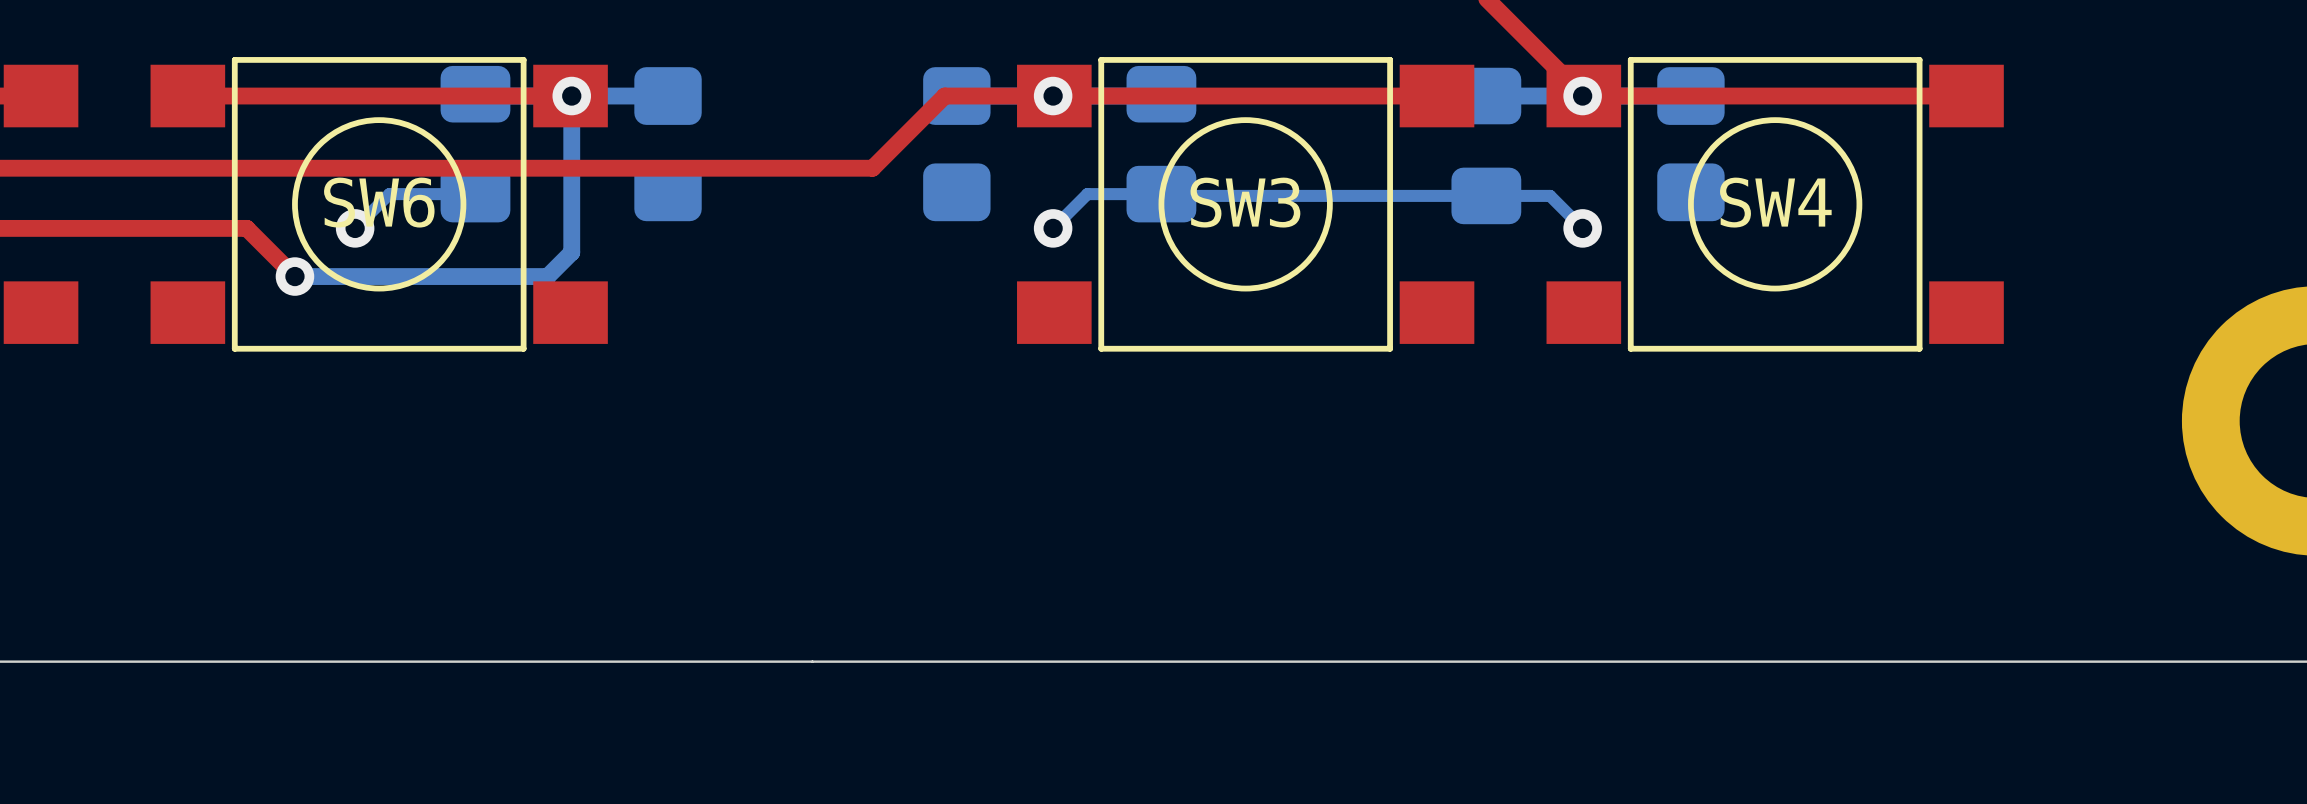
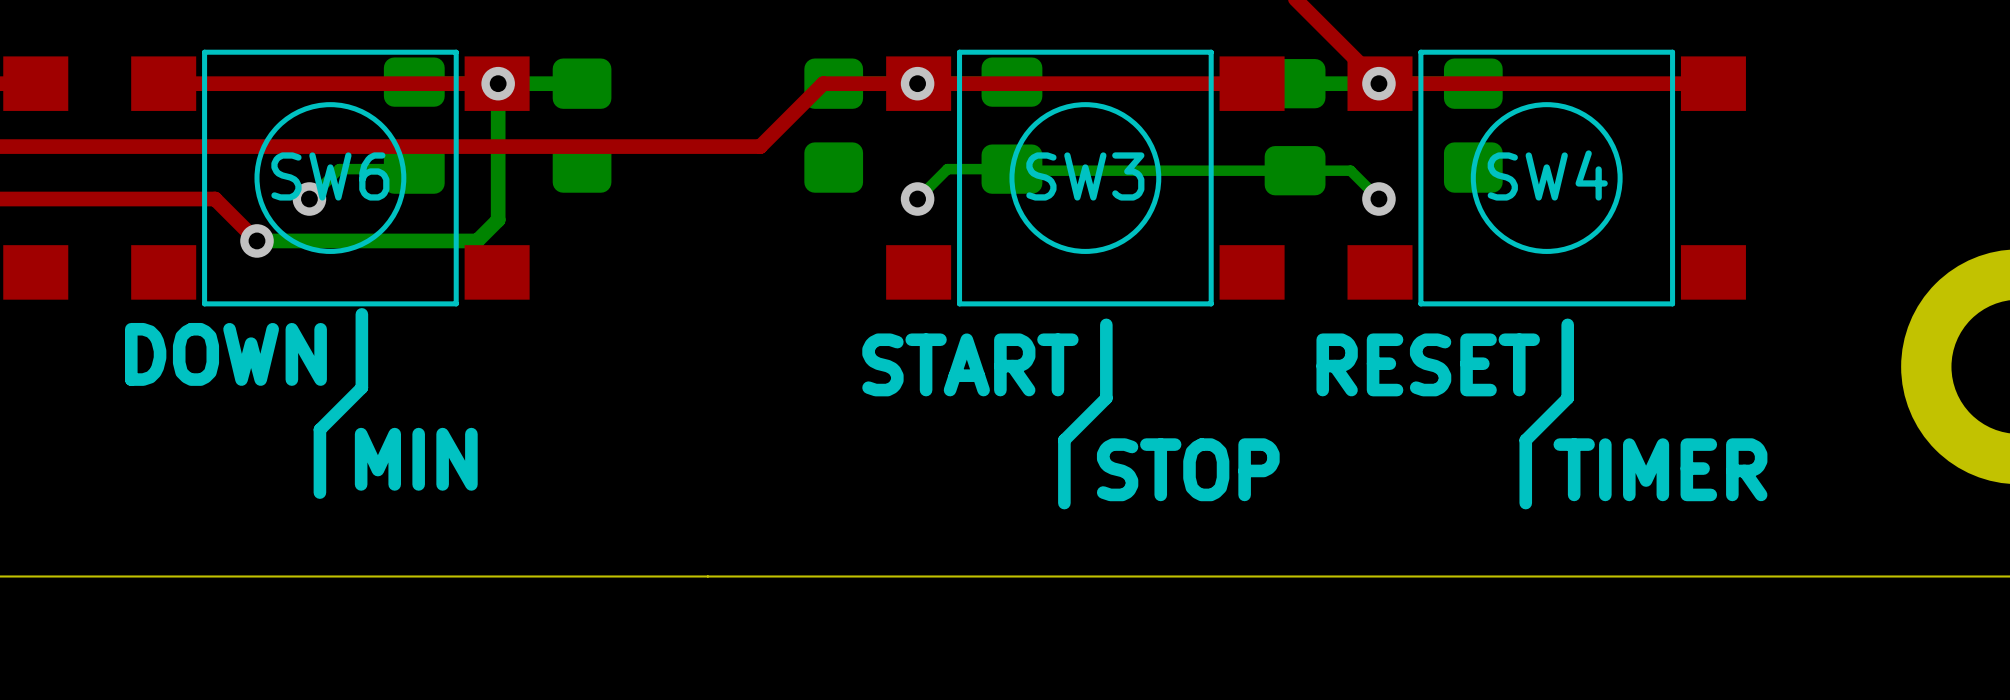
line: none -> (361, 314) (361, 387) (319, 429) (319, 492)
line: none -> (1106, 324) (1106, 398) (1064, 440) (1064, 503)
line: none -> (1567, 324) (1567, 398) (1525, 440) (1525, 503)
text: none -> DOWN (225, 354)
text: none -> START (970, 364)
text: none -> RESET (1428, 364)
text: none -> MIN (416, 459)
text: none -> STOP (1188, 469)
text: none -> TIMER (1660, 469)

